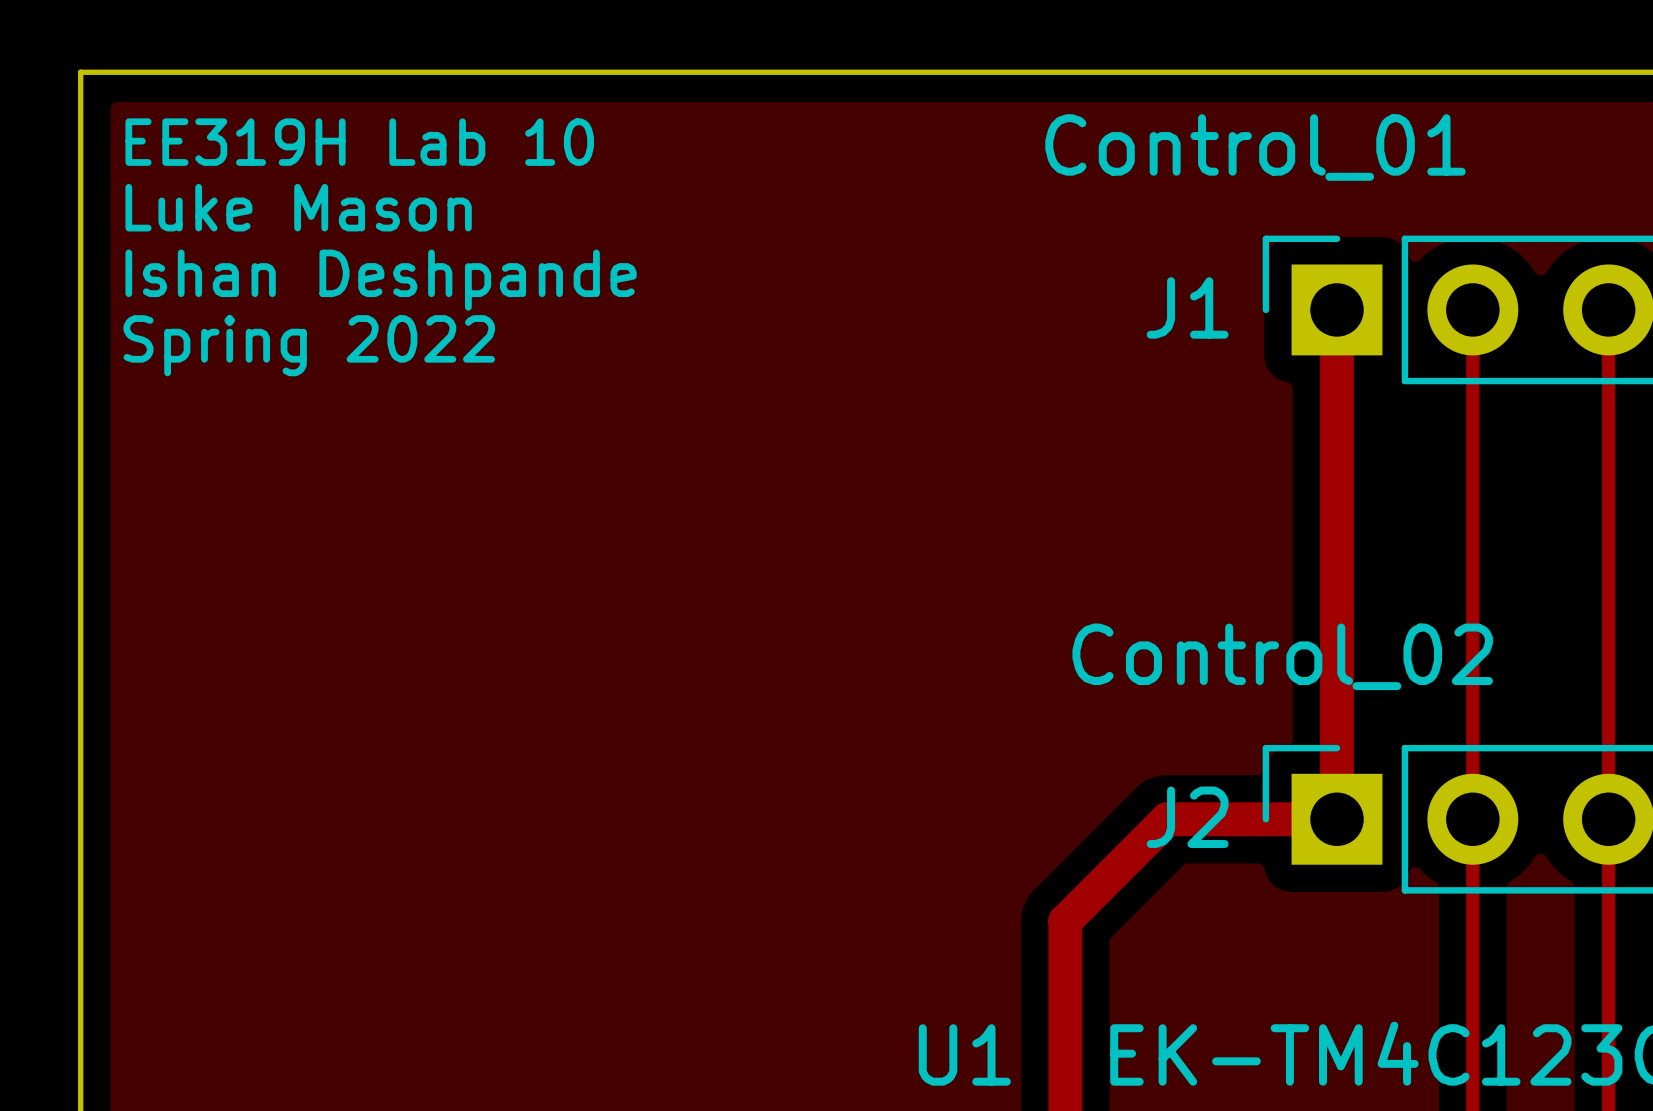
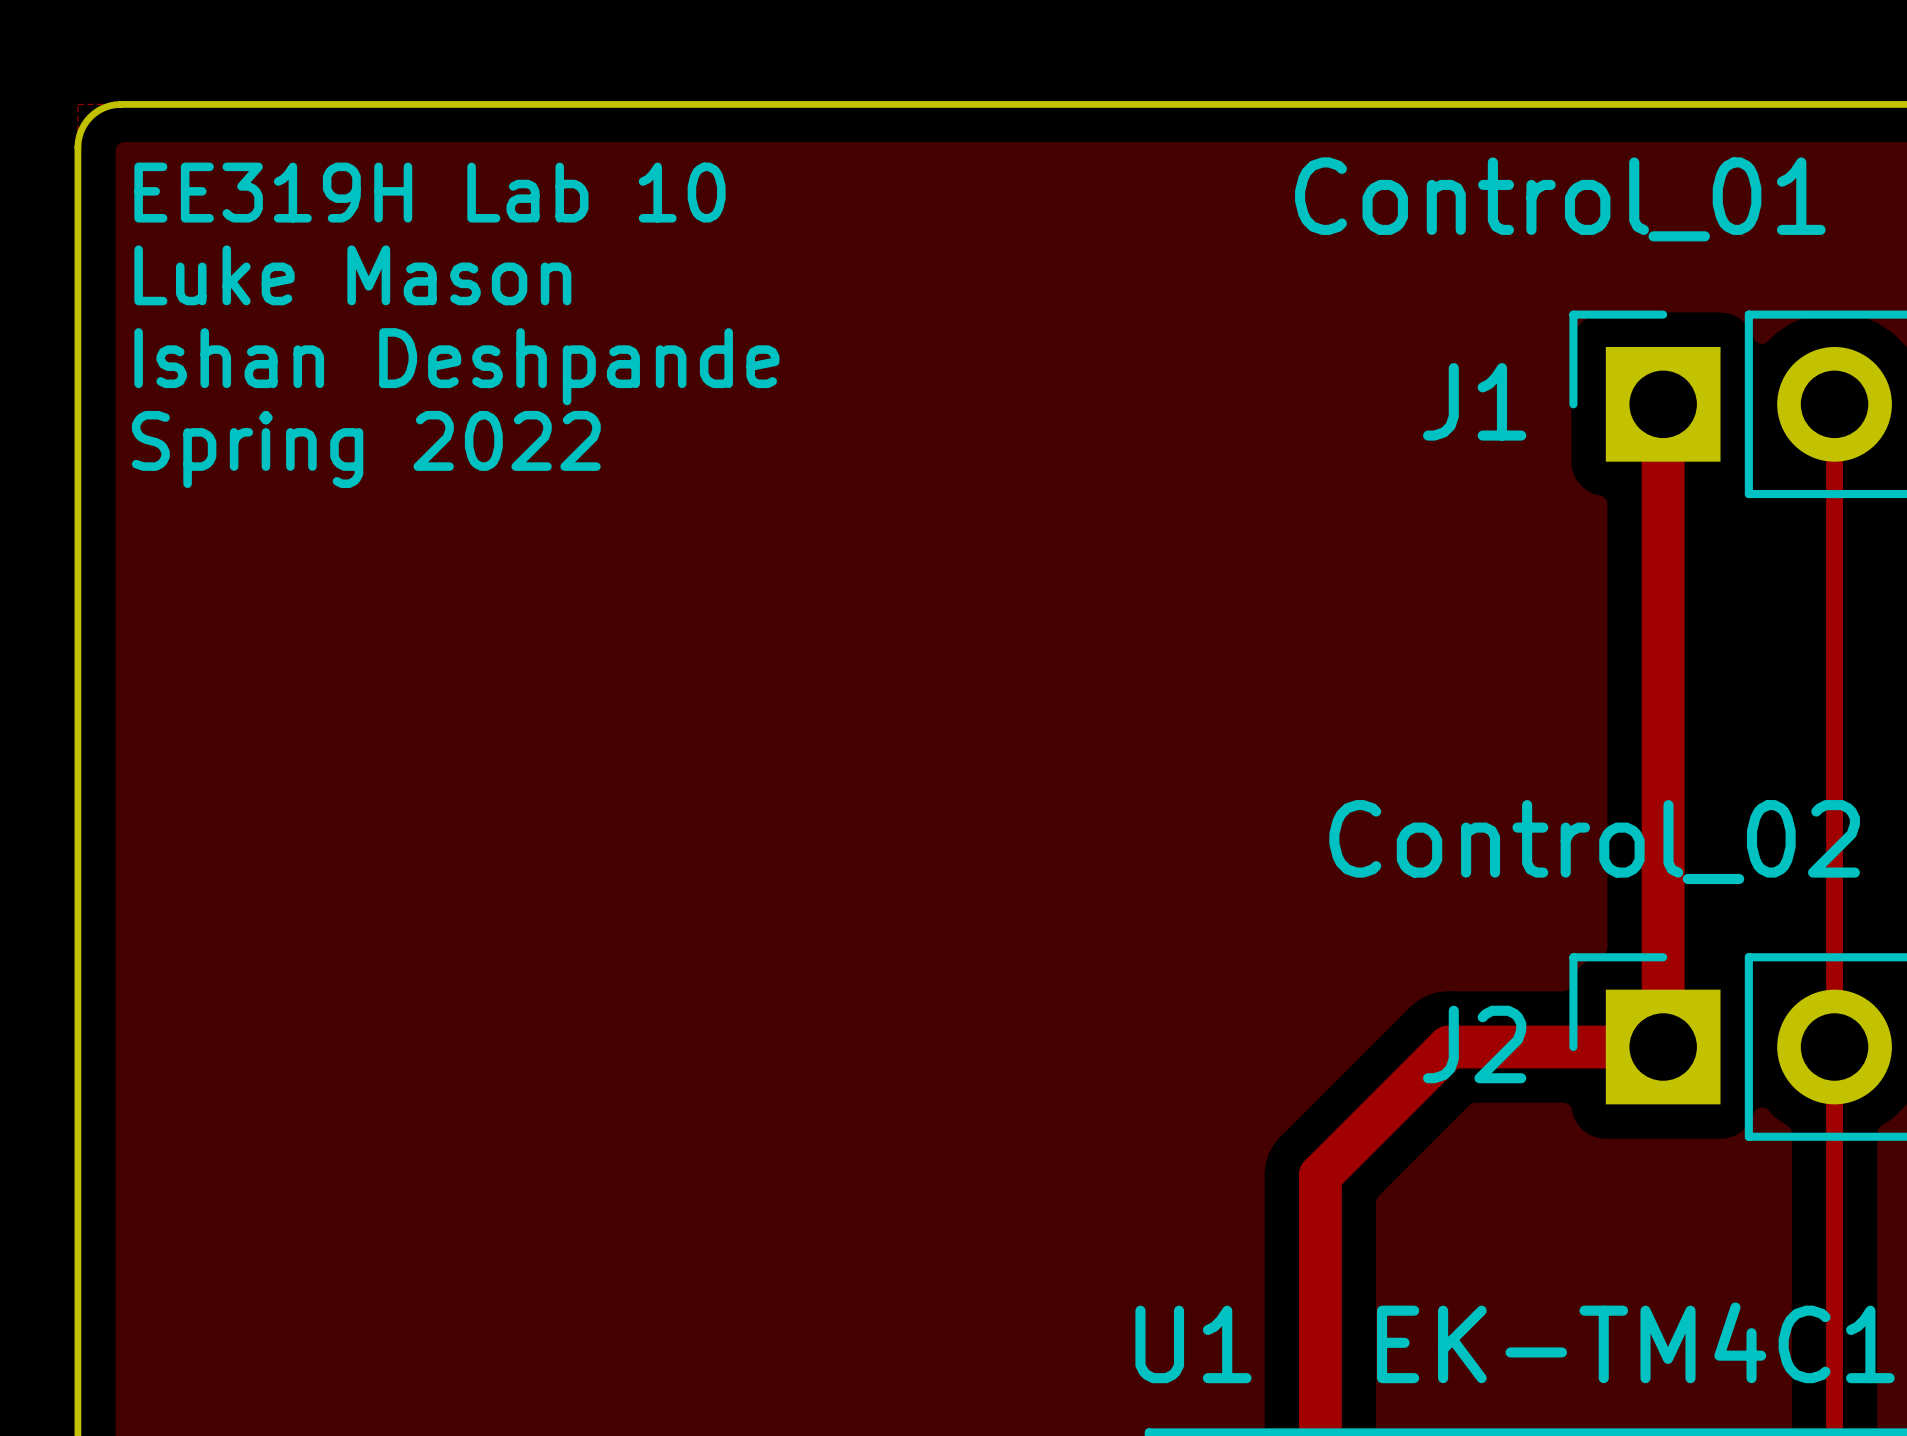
board edge: (114, 72) (80, 72) (80, 106) -> (120, 104) (104, 107) (90, 116) (81, 130) (77, 147)

